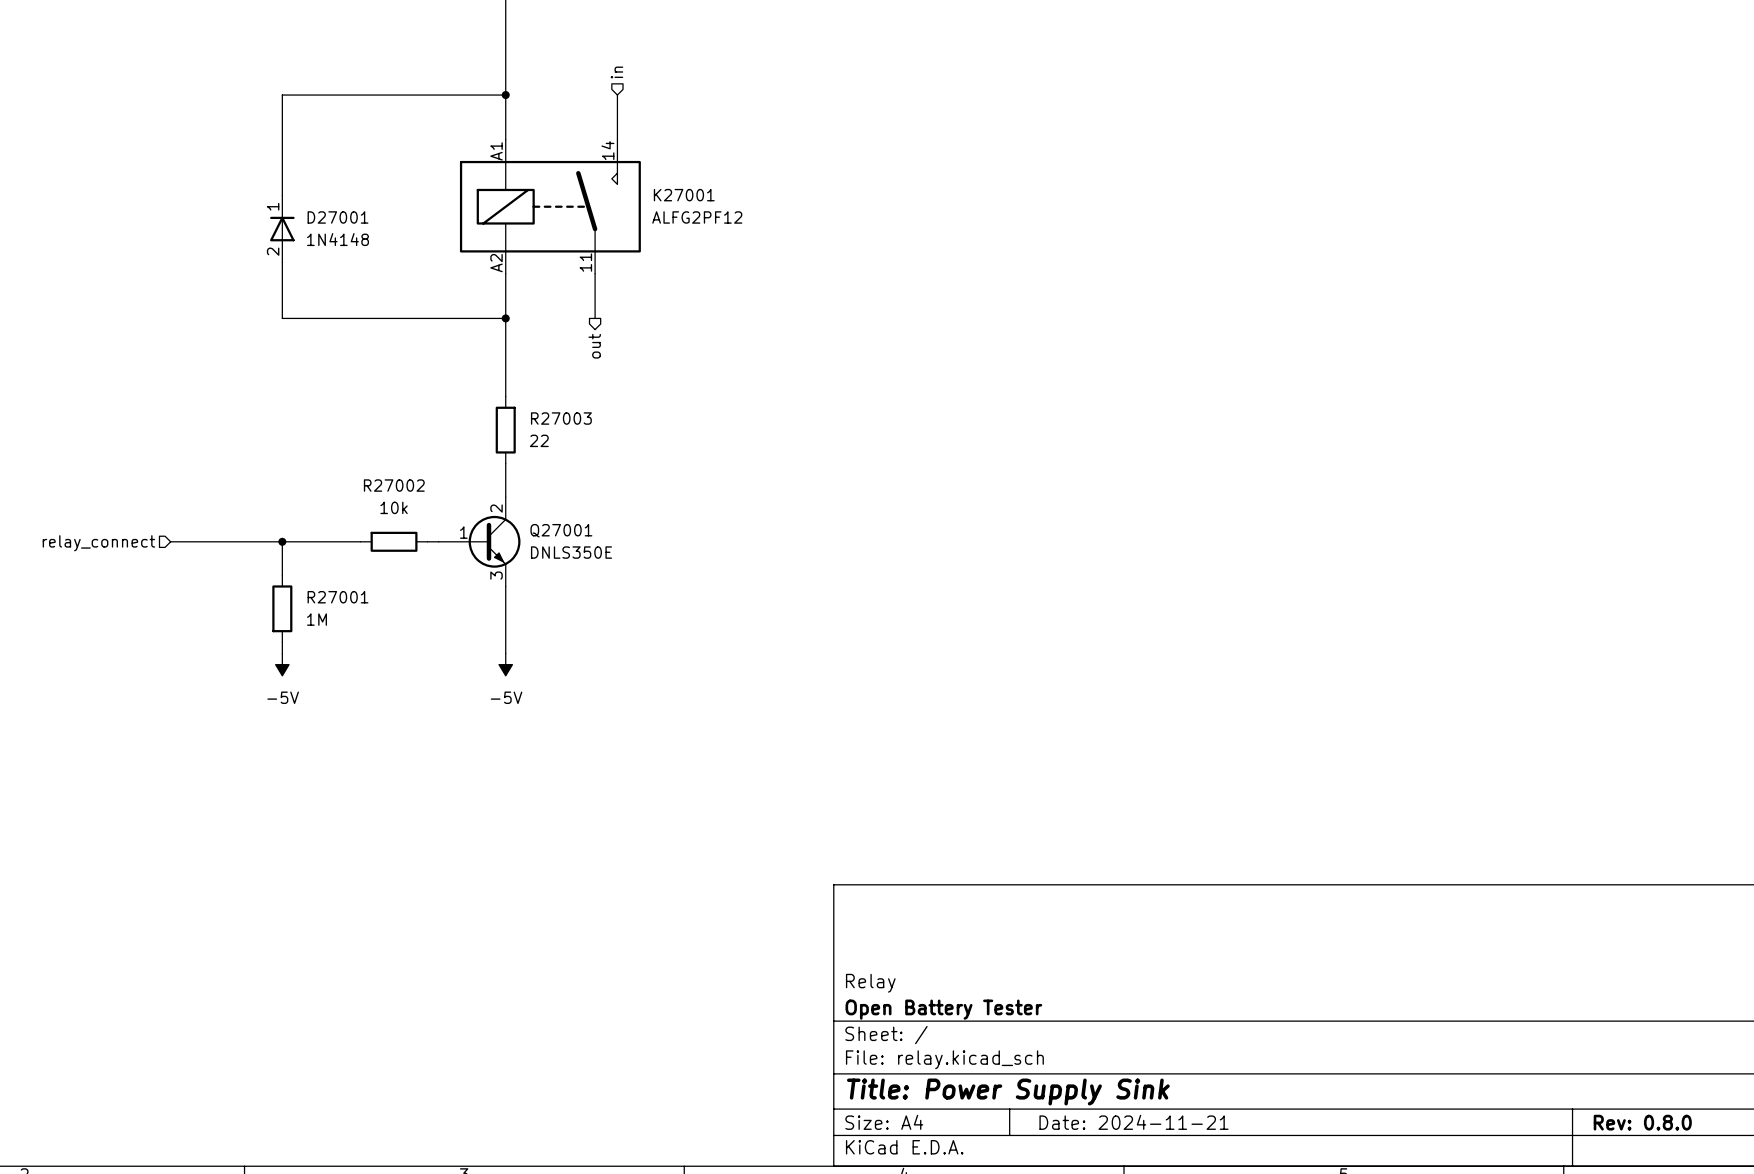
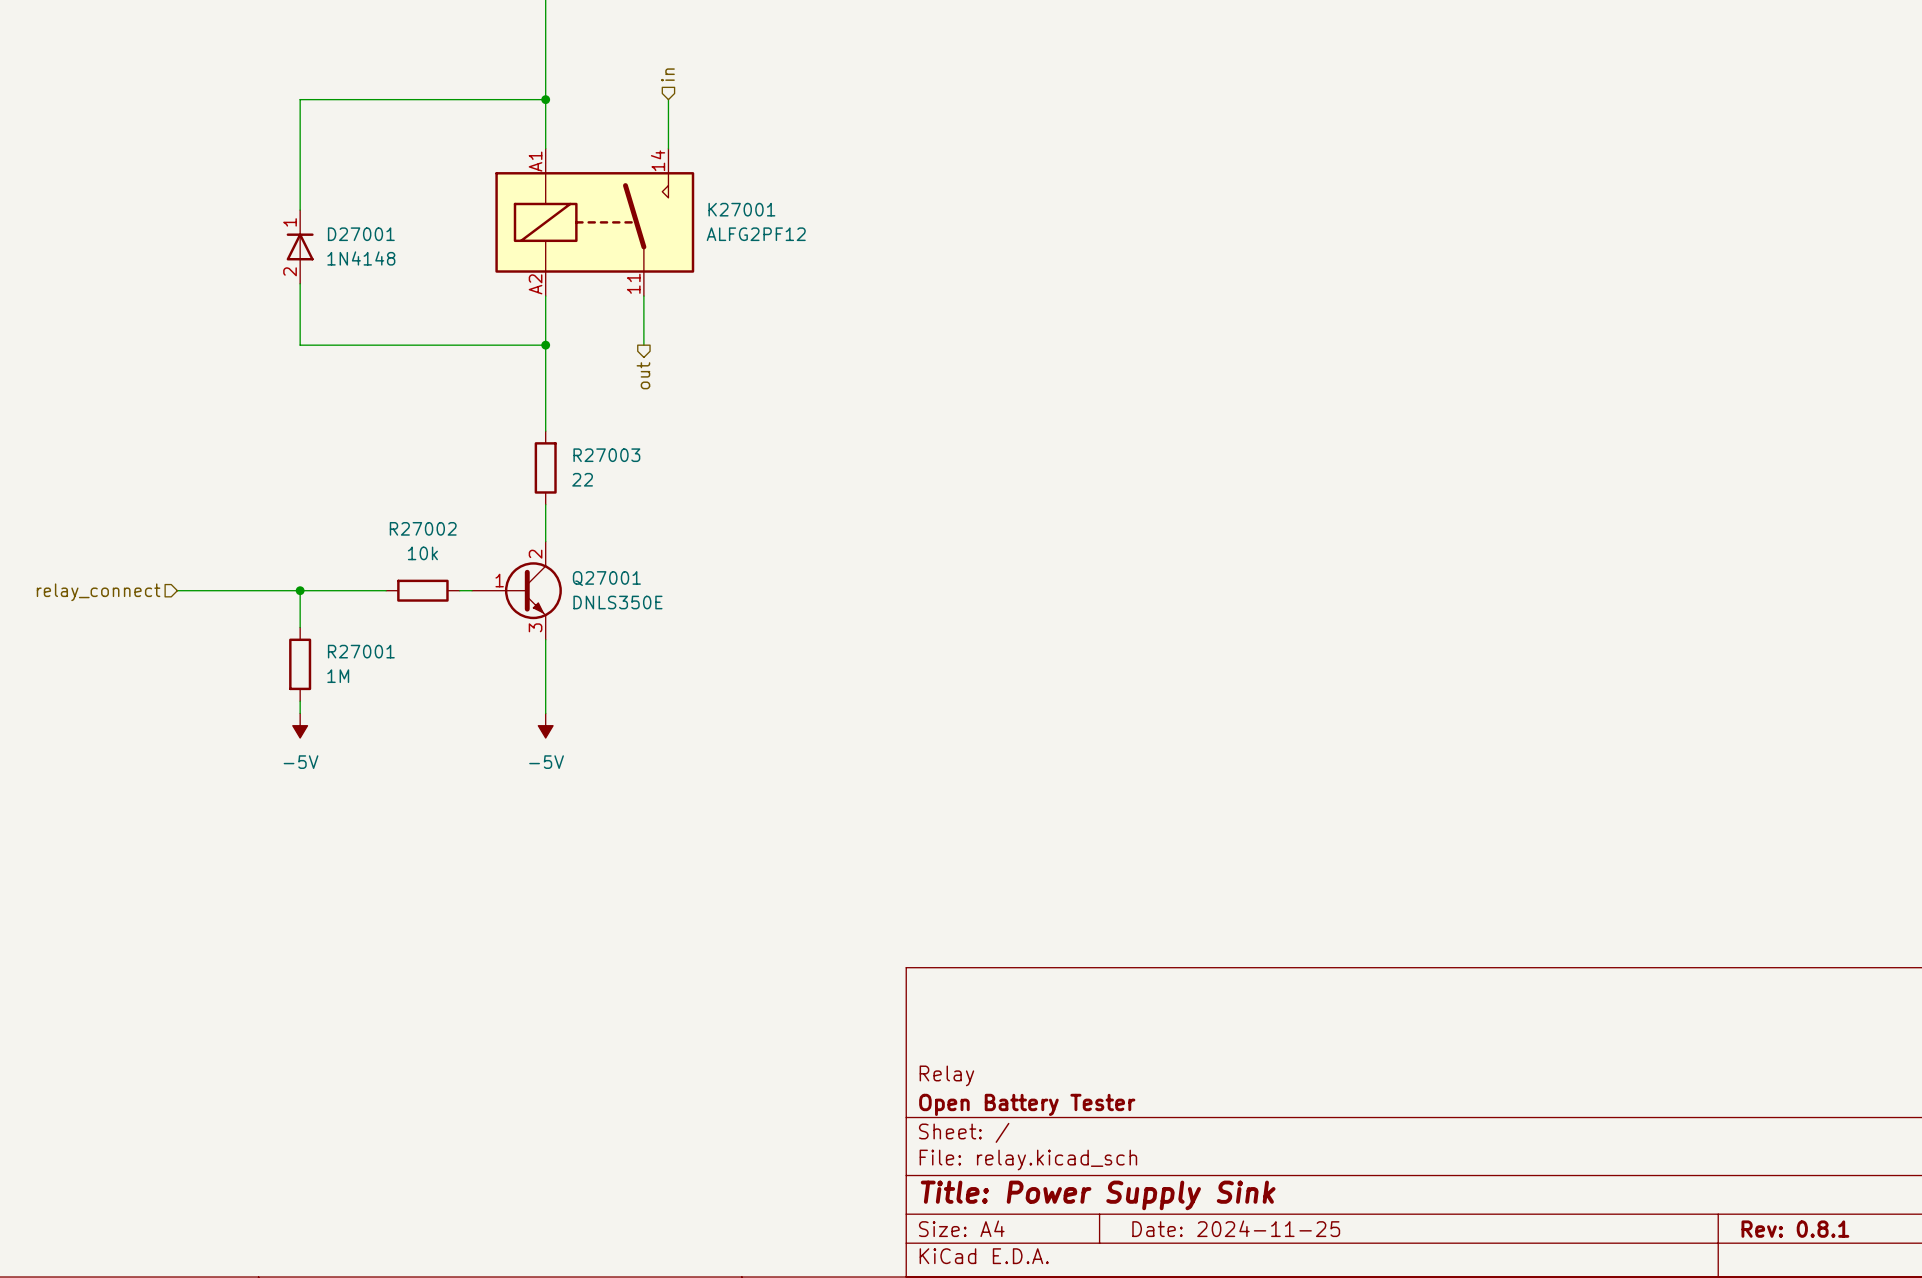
title block: Date: 2024-11-21 (1133, 1122) -> Date: 2024-11-25 (1236, 1228)
title block: Rev: 0.8.0 (1642, 1122) -> Rev: 0.8.1 (1795, 1229)

